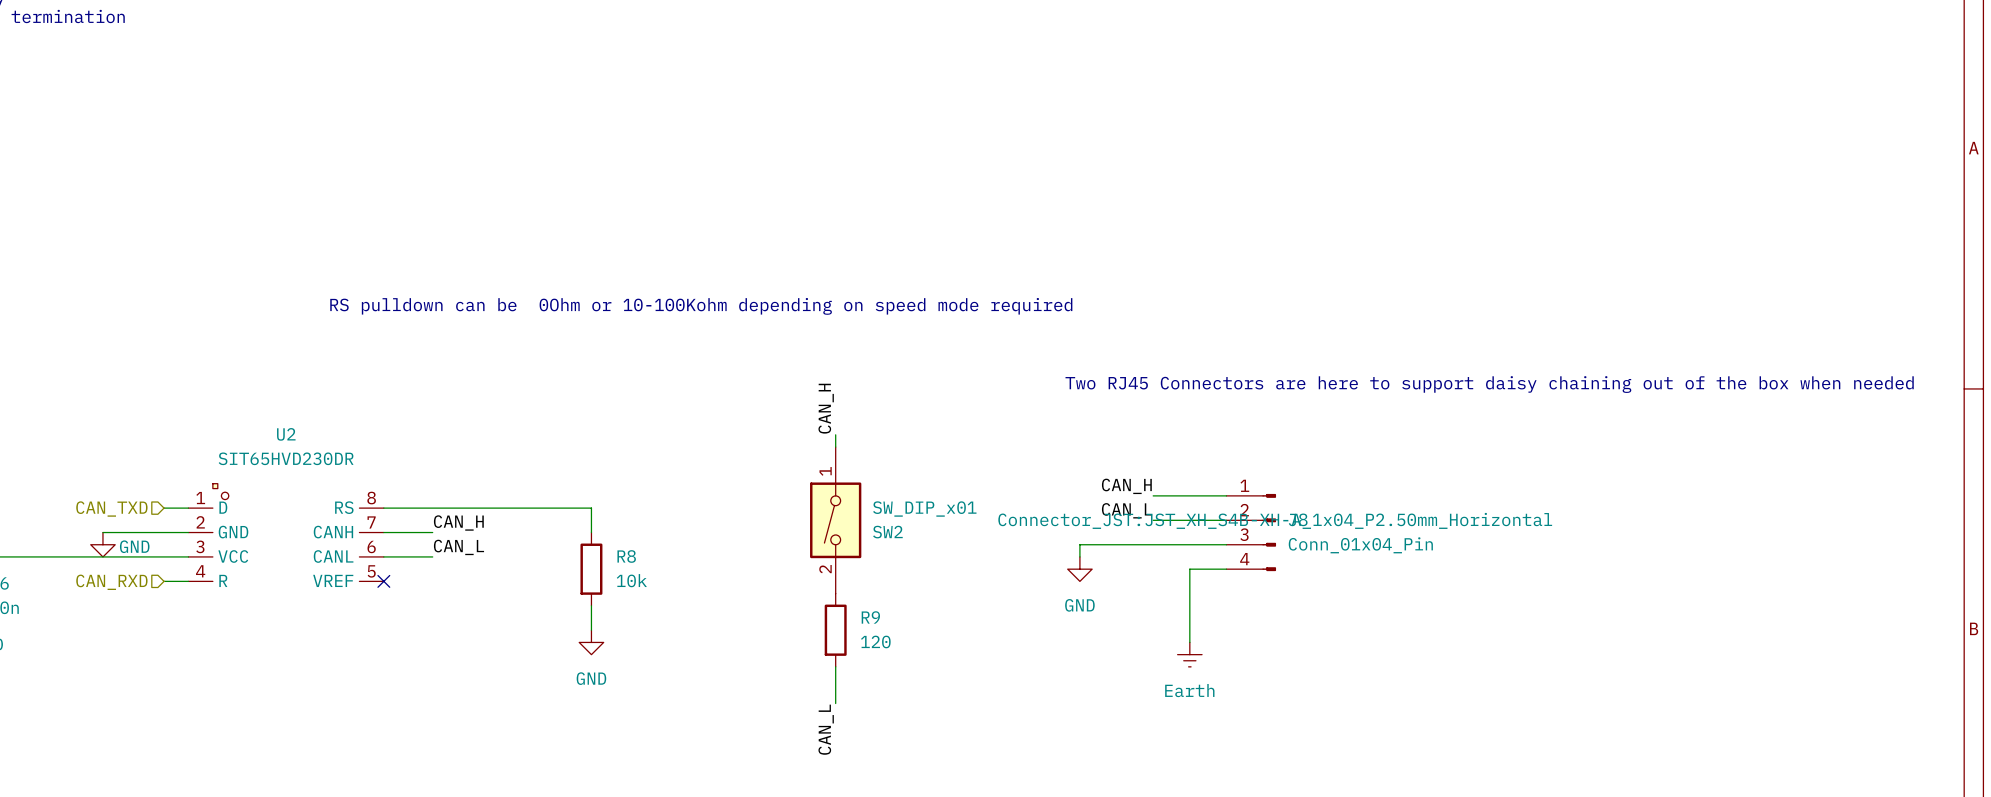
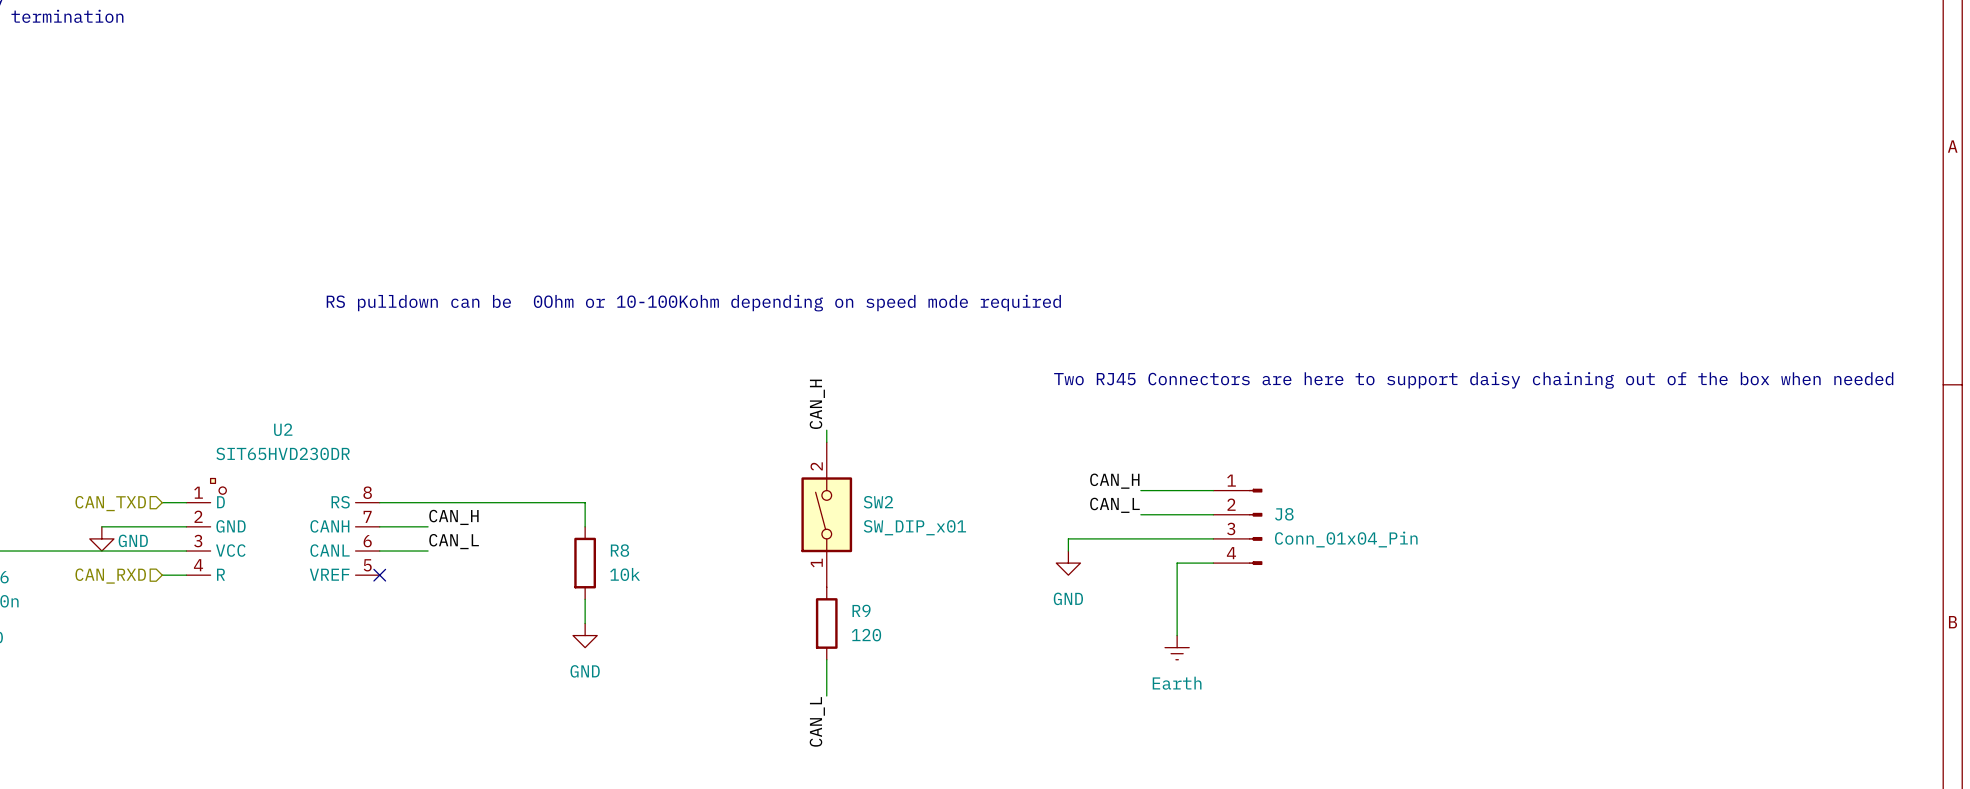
SW2 flip: as is (835, 520) -> up-down (826, 514)
J8 text: Connector_JST:JST_XH_S4B-XH-A_1x04_P2.50mm_Horizontal (1275, 520) -> none

